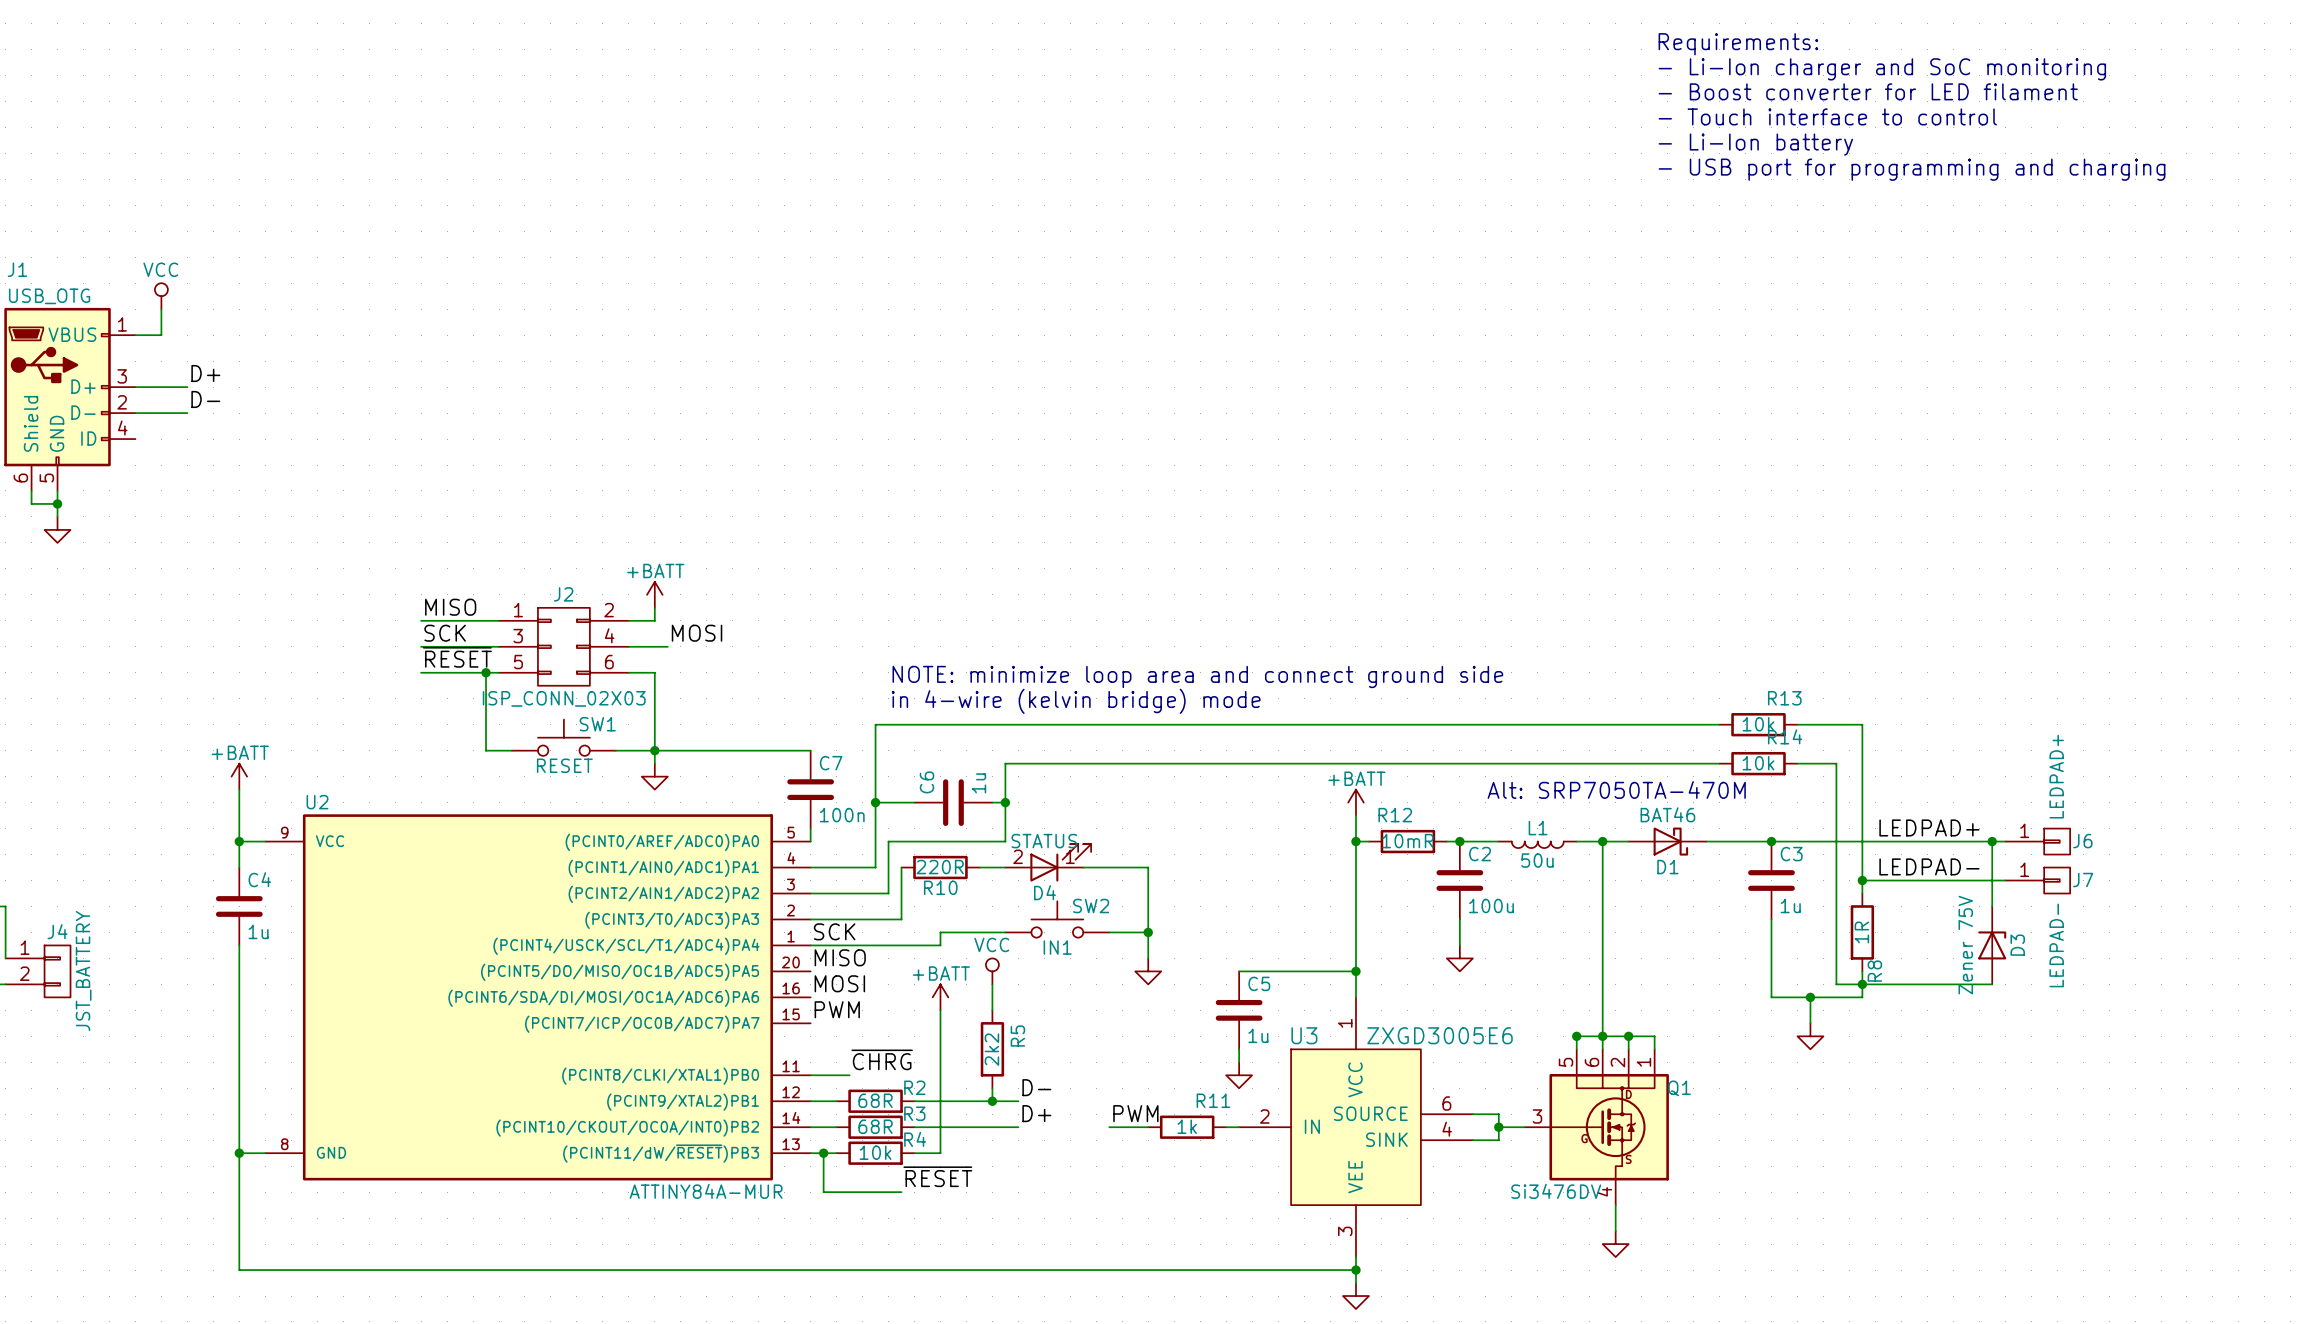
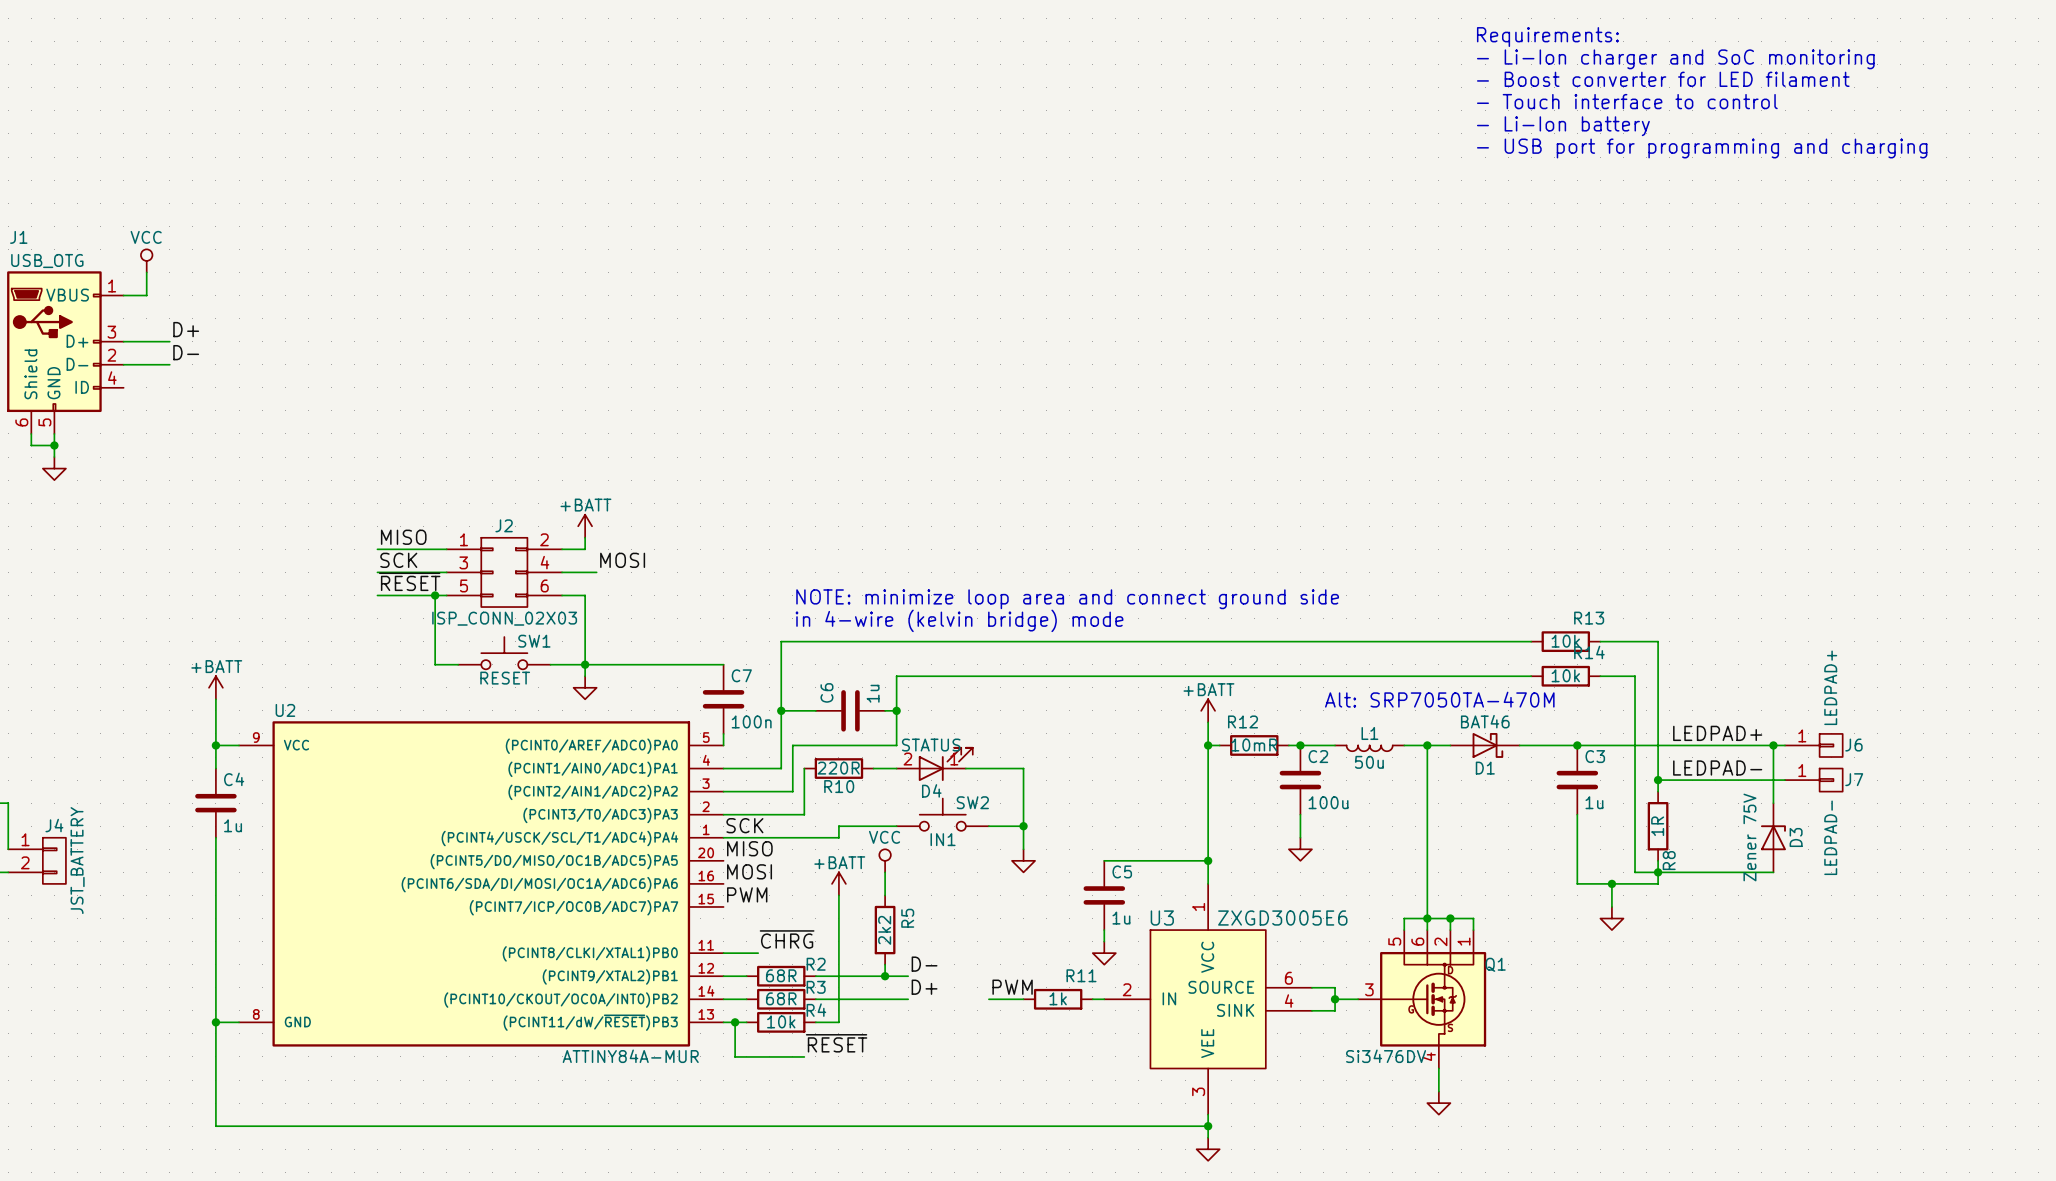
junction: (1576, 1036) -> none

